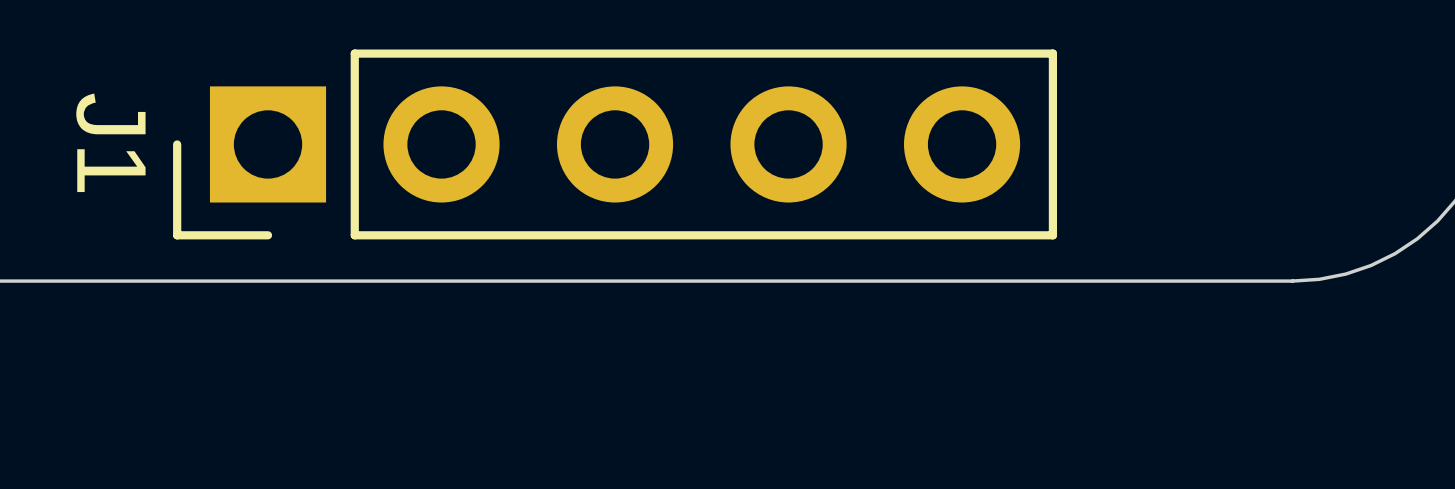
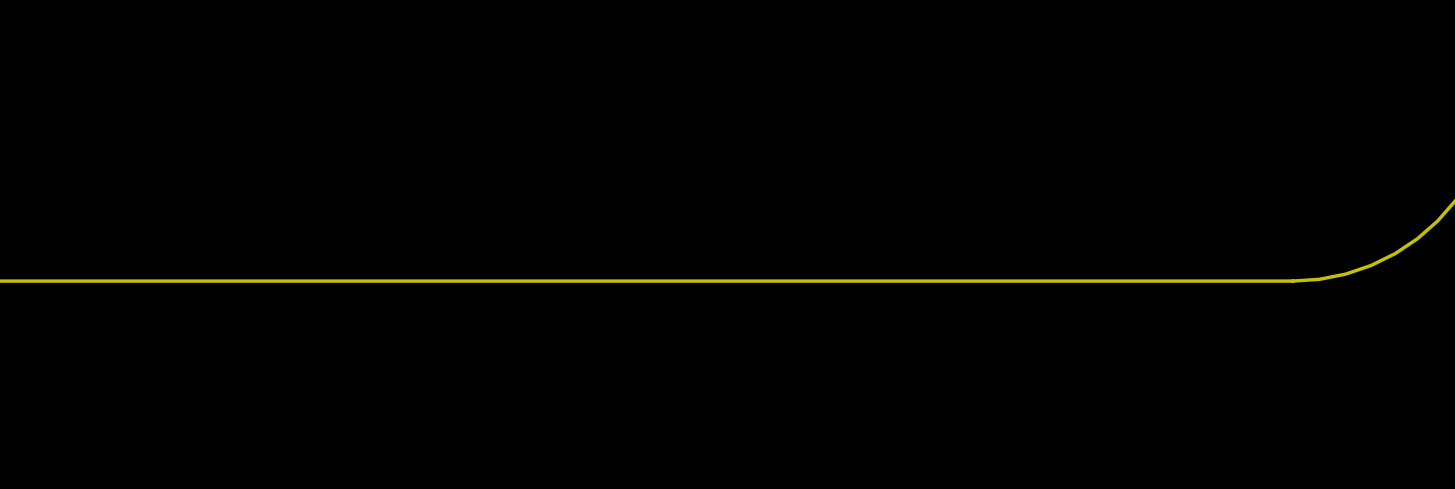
J1: (615, 144) -> none

